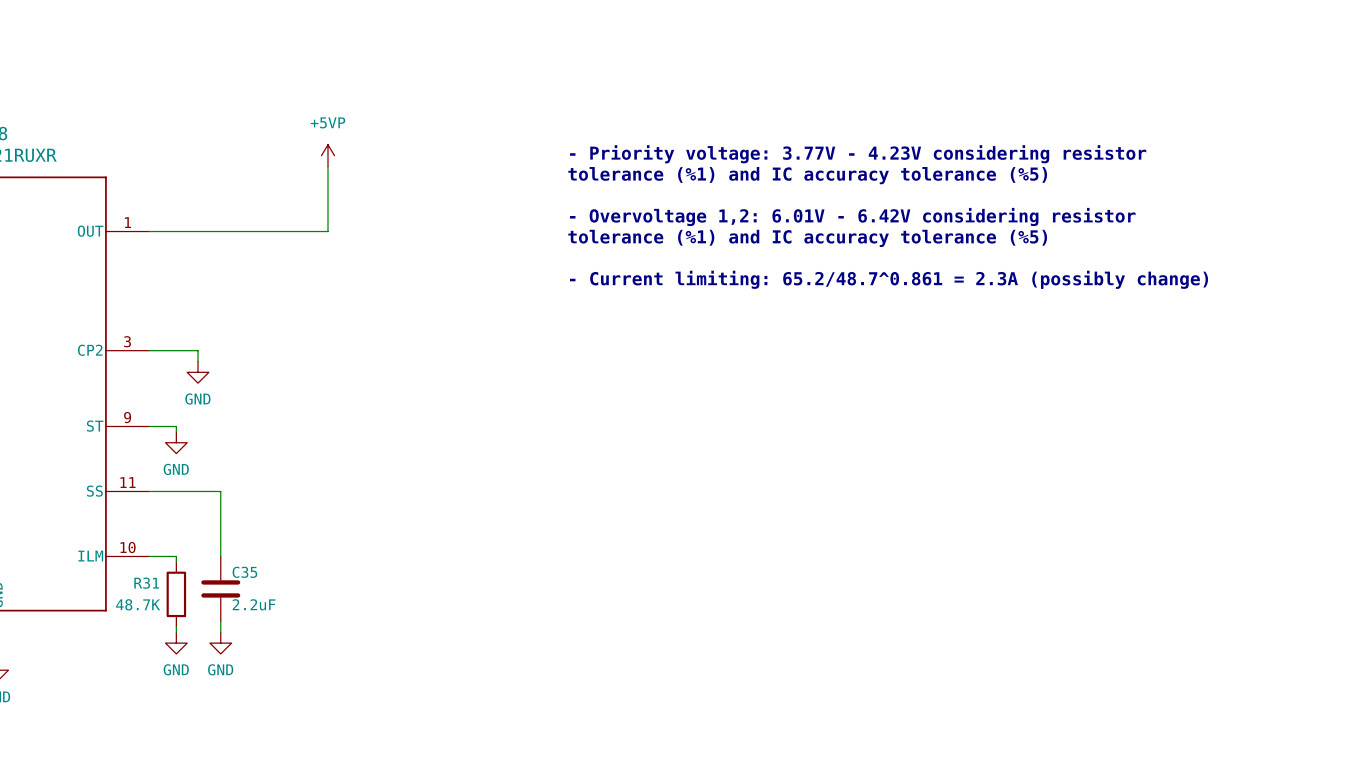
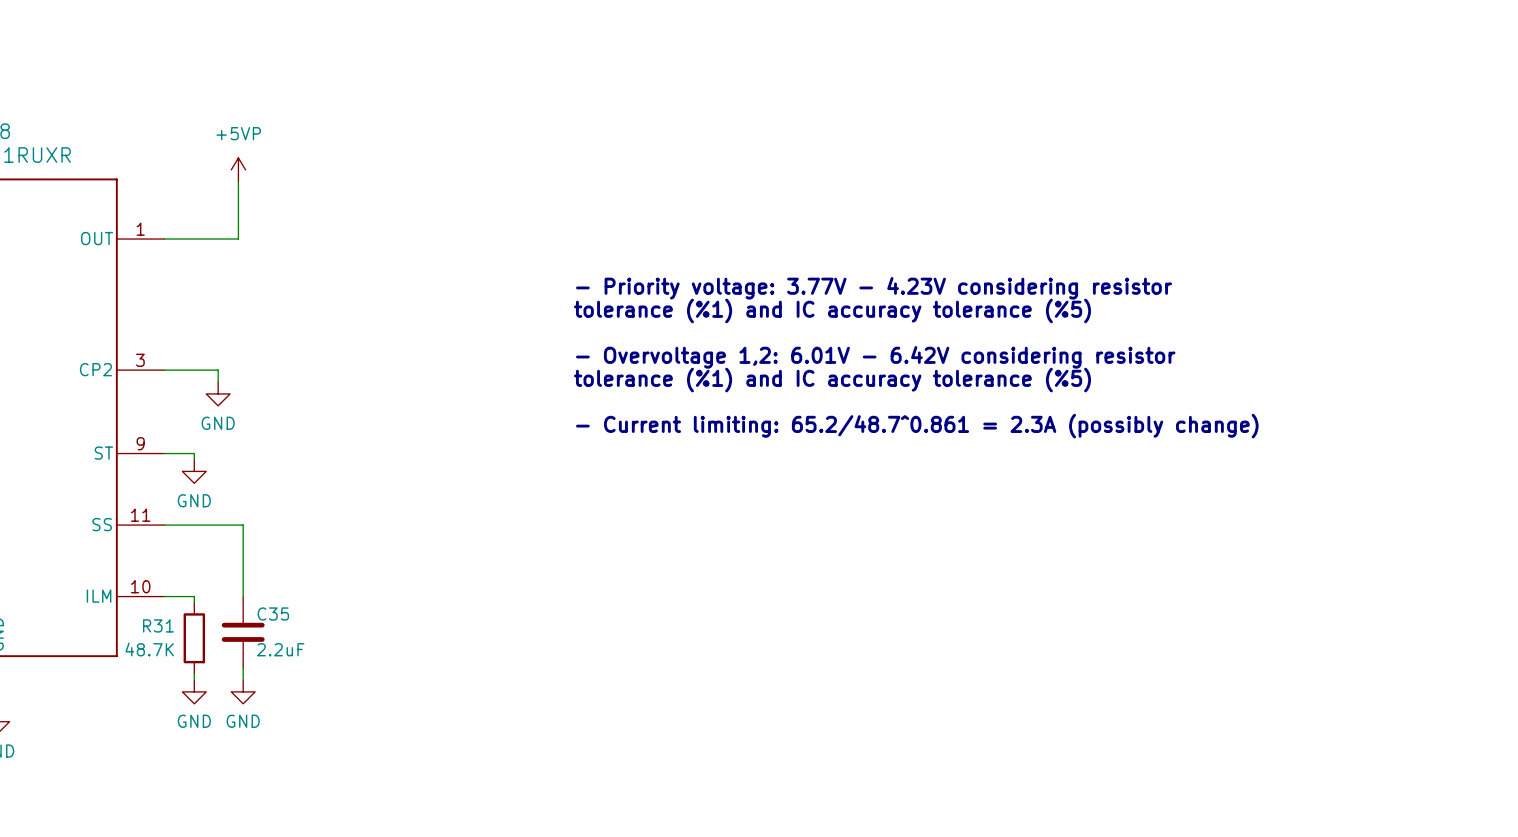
text position: - Priority voltage: 3.77V - 4.23V considering resistor (858, 154) -> - Priority voltage: 3.77V - 4.23V considering resistor (874, 288)
power symbol position: +5VP (328, 155) -> +5VP (238, 169)
wire: (328, 166) (328, 231) (216, 231) -> (238, 181) (238, 239)
text: tolerance (%1) and IC accuracy tolerance (%5) (807, 175) -> none
text position: - Overvoltage 1,2: 6.01V - 6.42V considering resistor (852, 217) -> - Overvoltage 1,2: 6.01V - 6.42V considering resistor (875, 357)
text: tolerance (%1) and IC accuracy tolerance (%5) (807, 238) -> none
text position: - Current limiting: 65.2/48.7^0.861 = 2.3A (possibly change) (889, 279) -> - Current limiting: 65.2/48.7^0.861 = 2.3A (possibly change) (917, 426)
text: none -> tolerance (%1) and IC accuracy tolerance (%5) (832, 310)
text: none -> tolerance (%1) and IC accuracy tolerance (%5) (832, 380)

